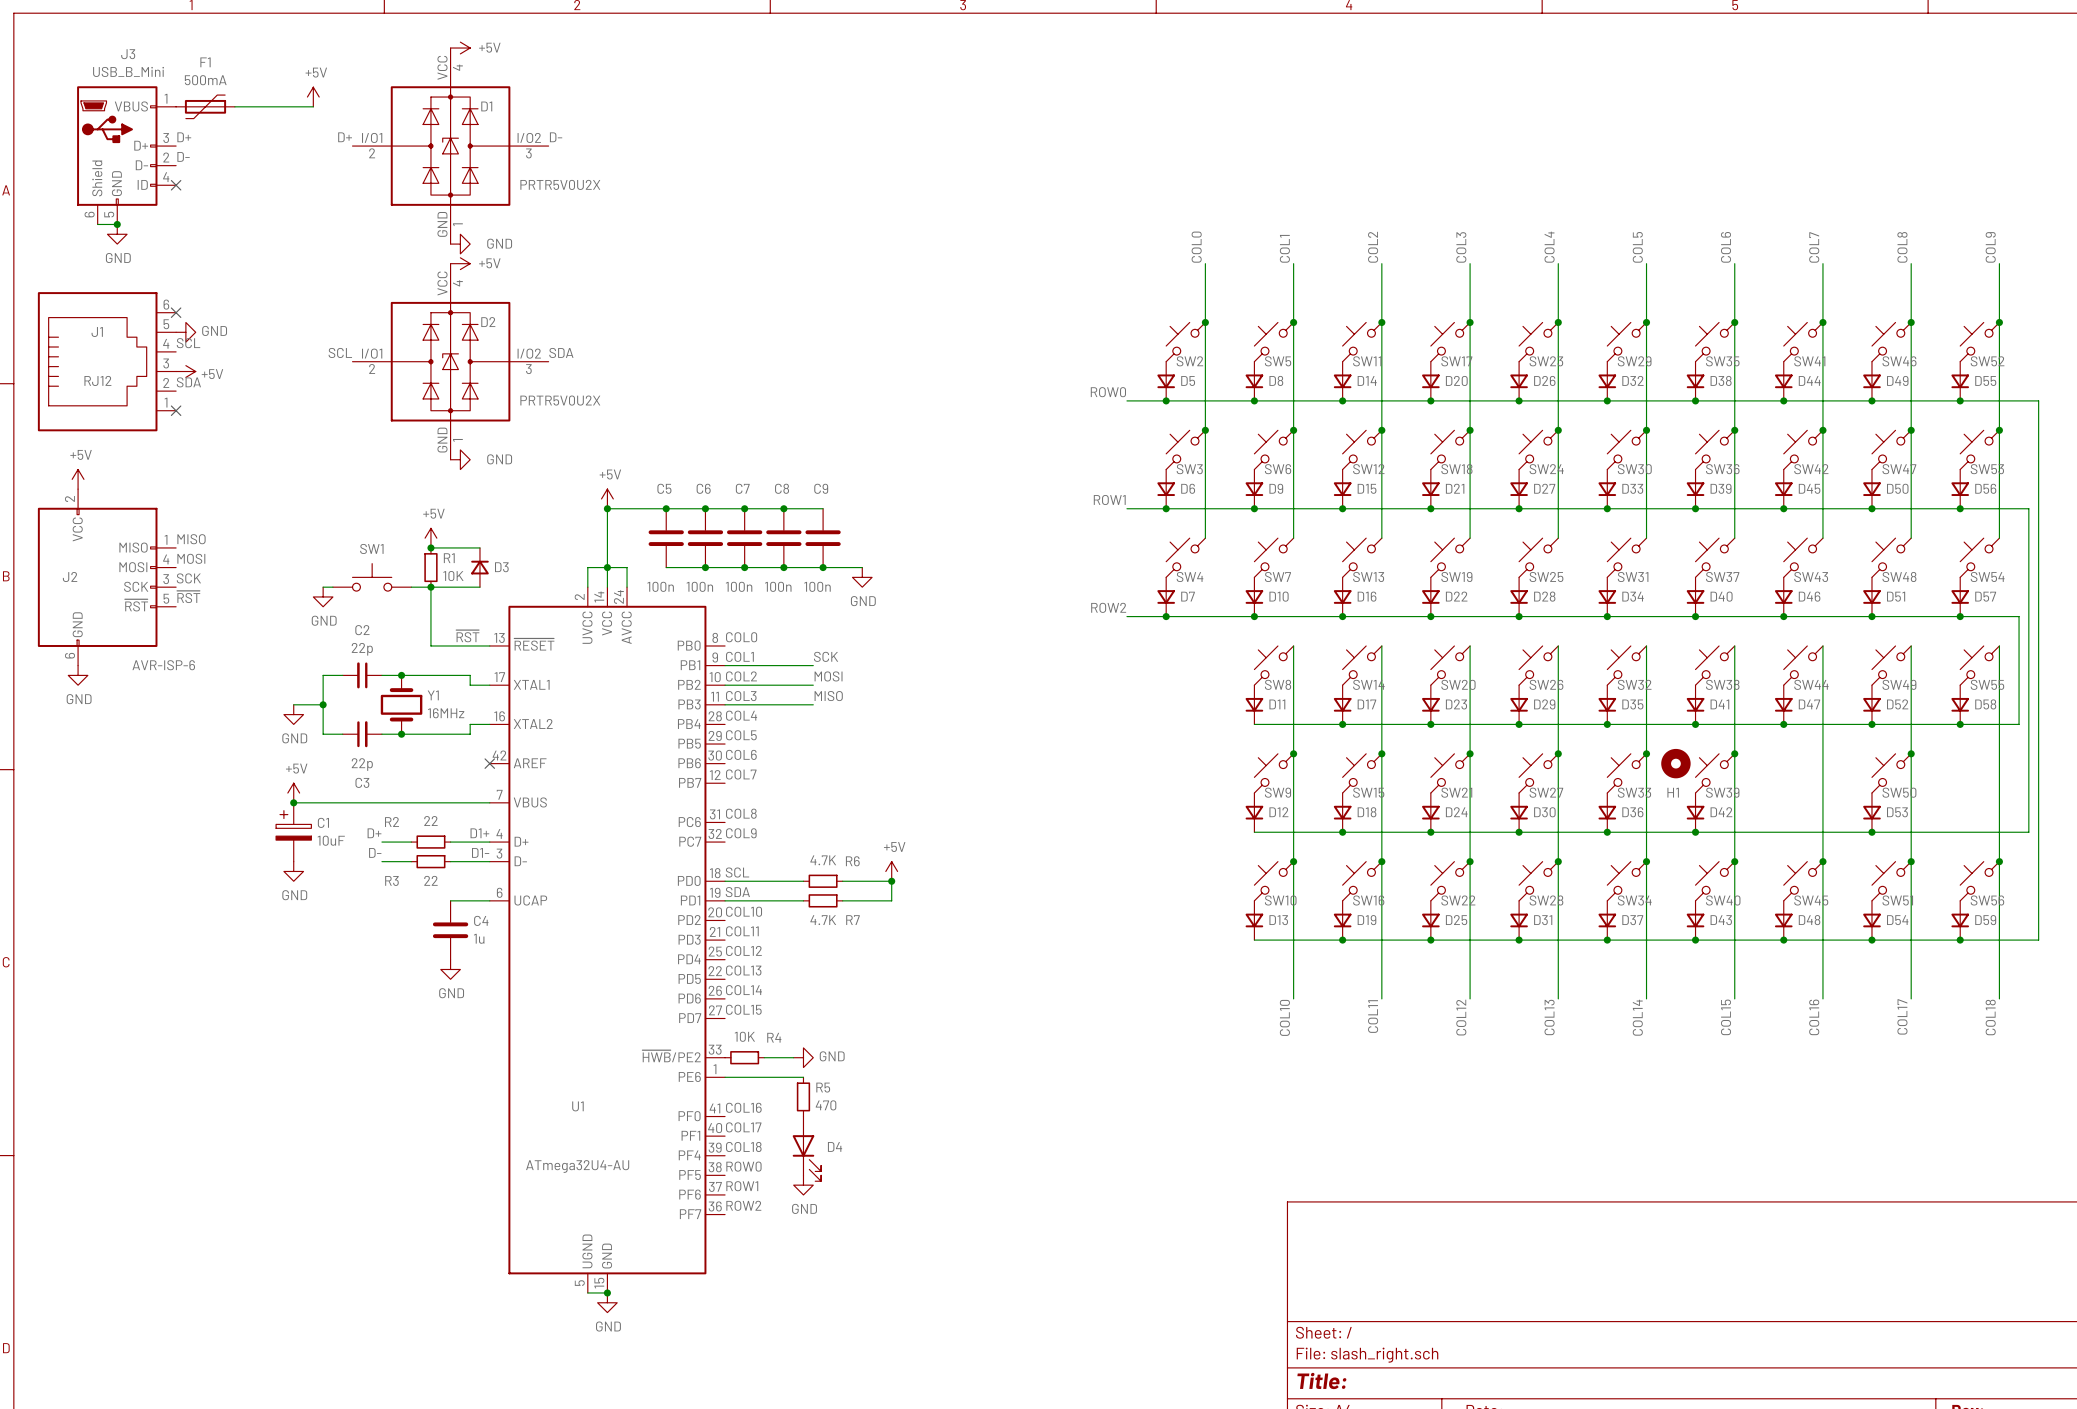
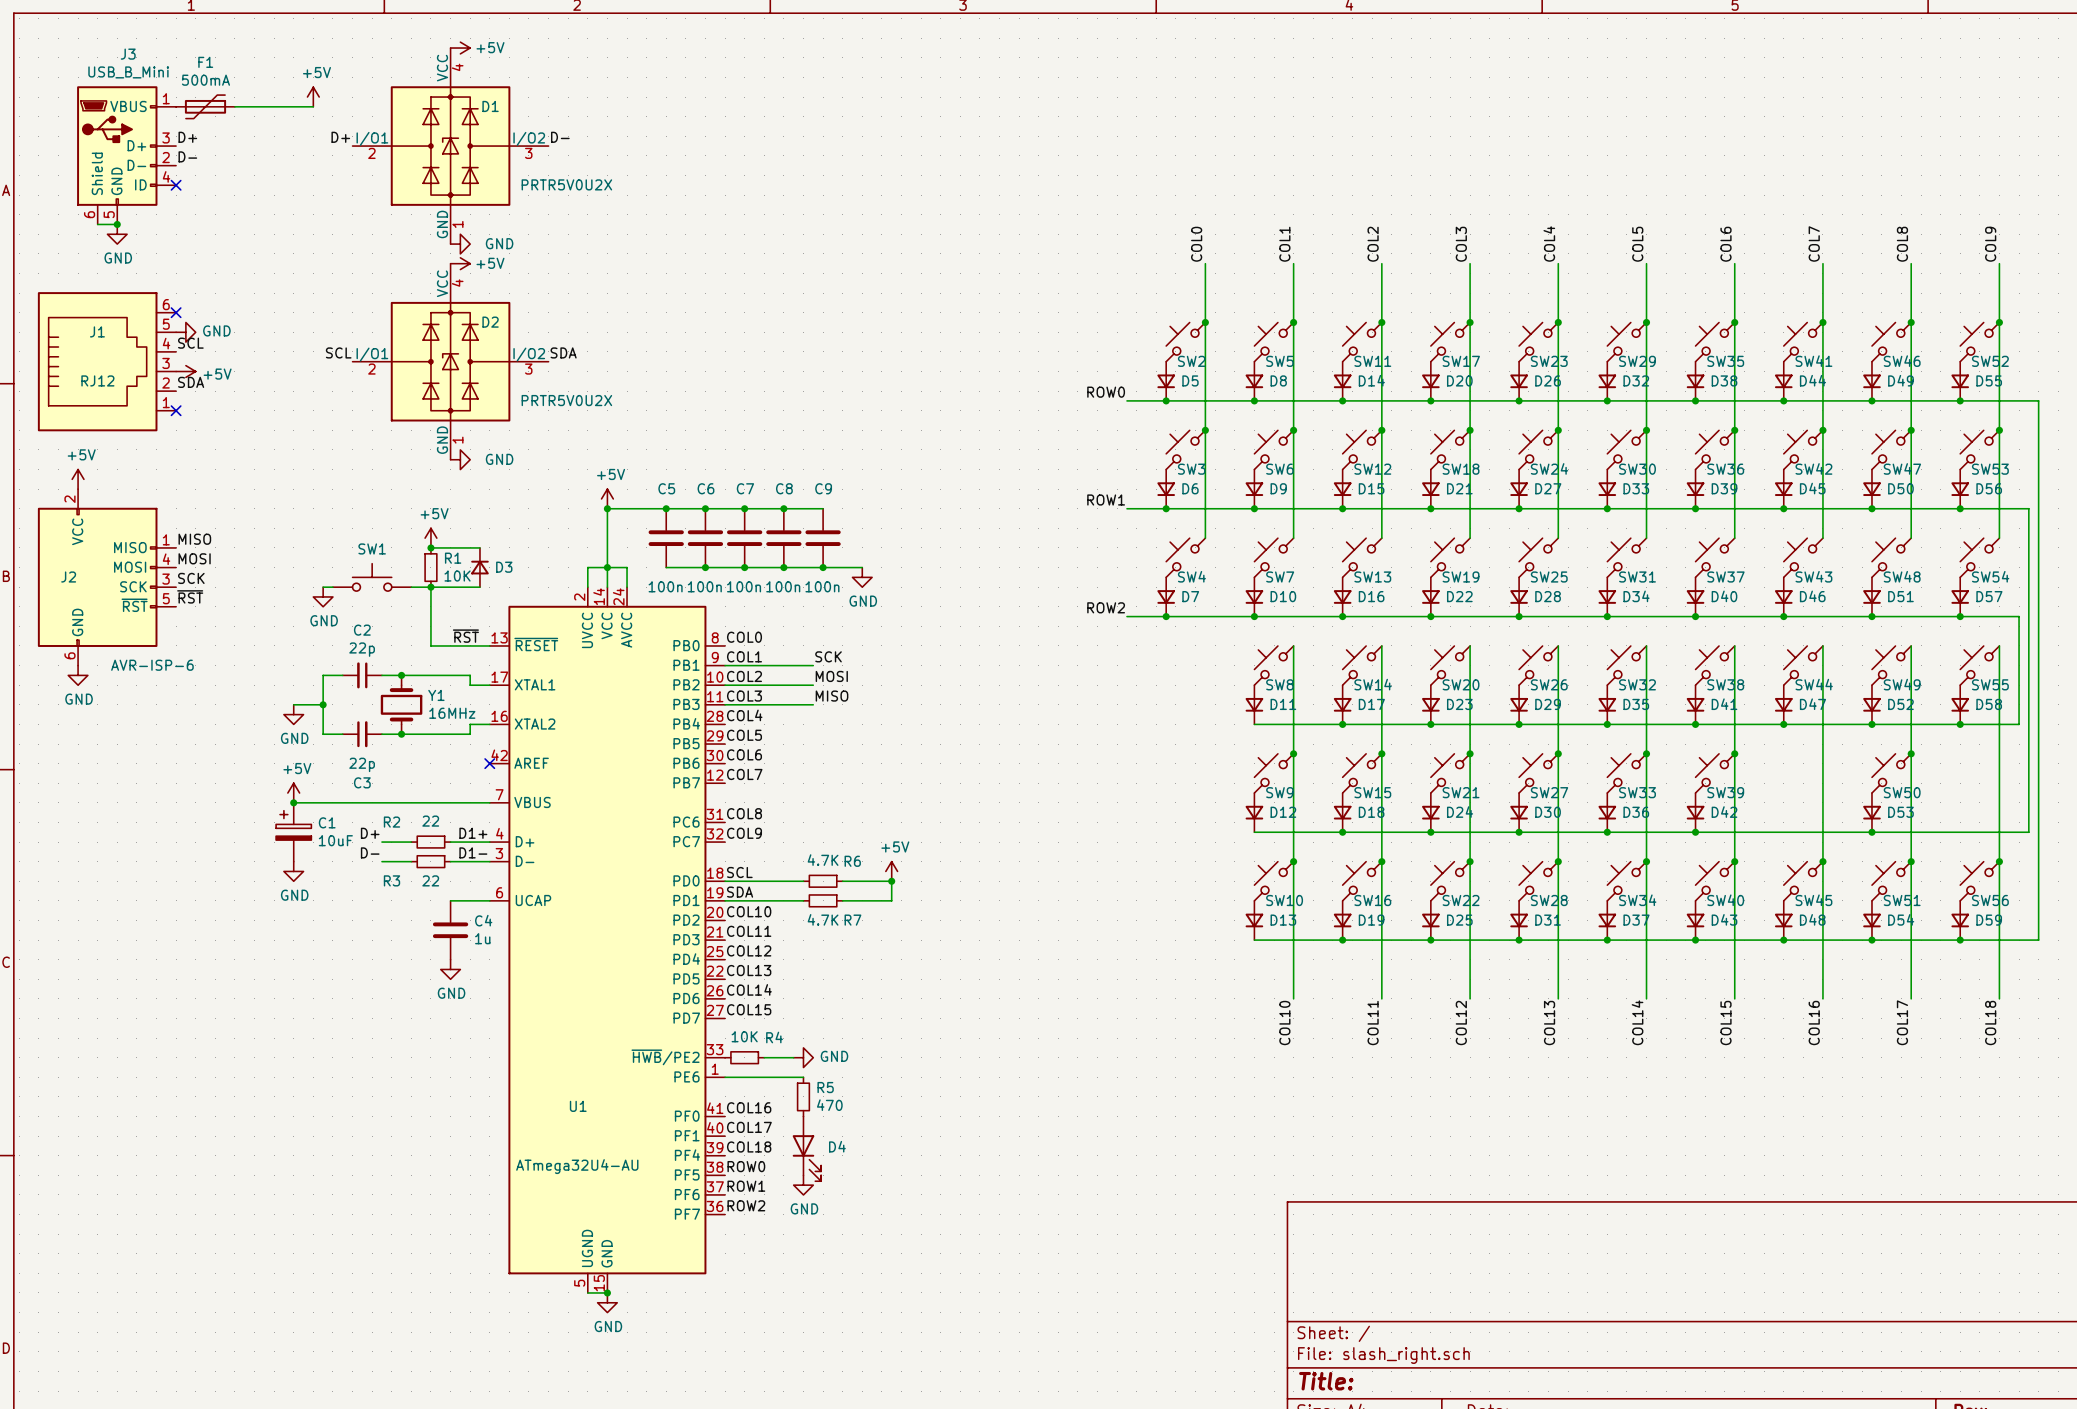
H1: (1675, 763) -> none

